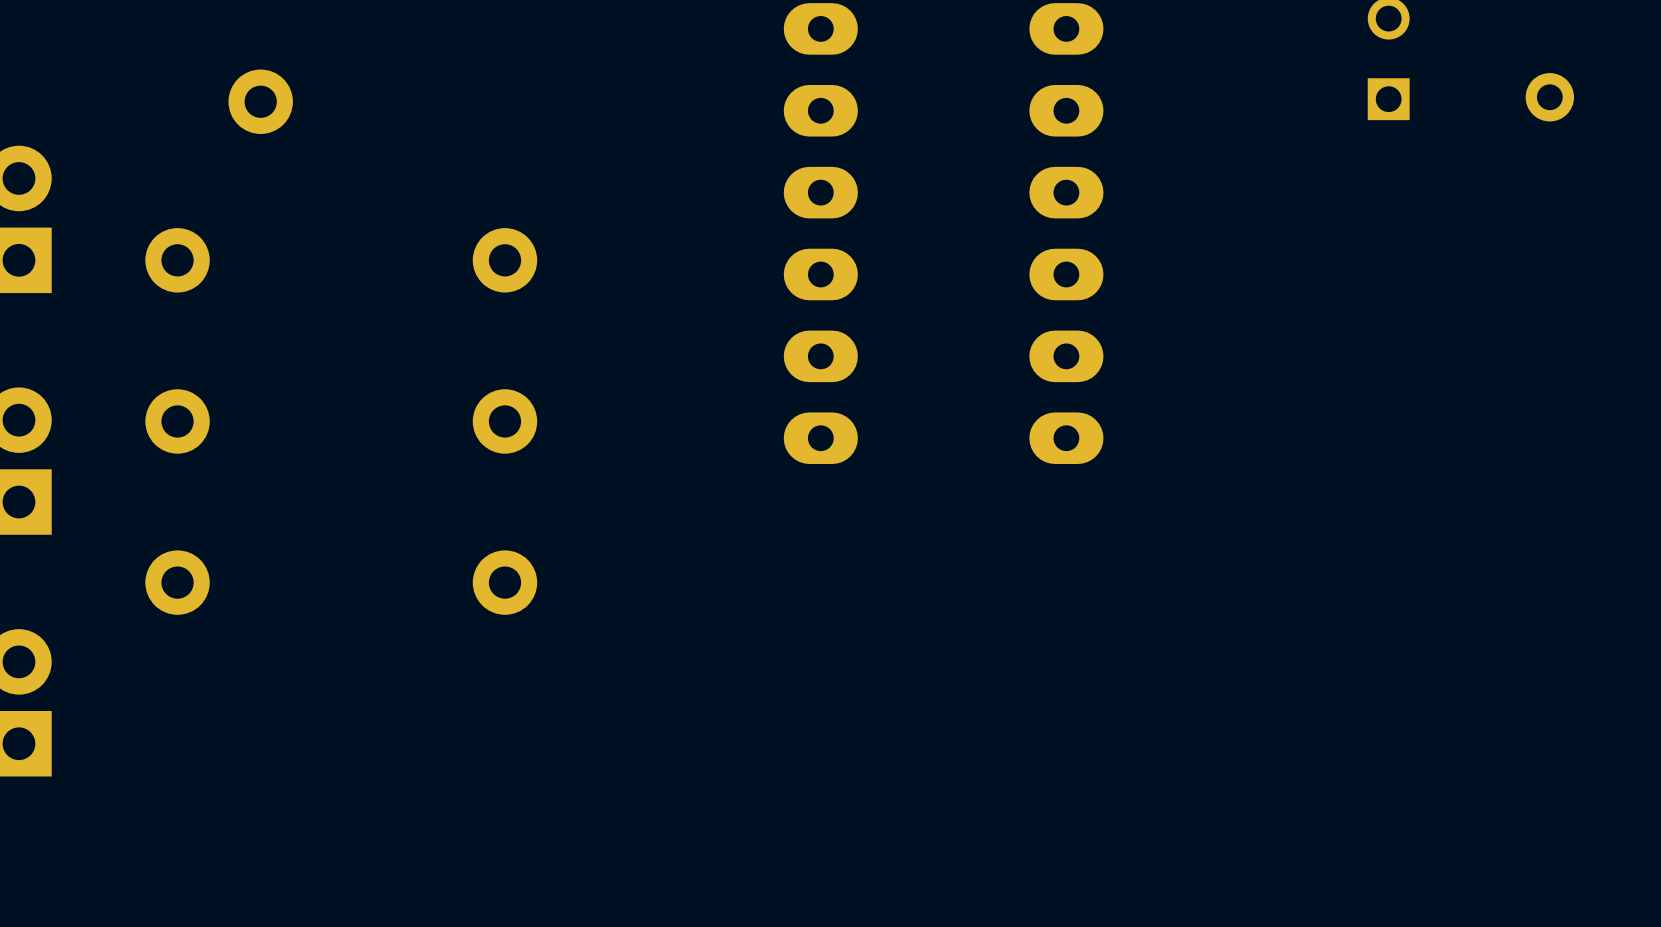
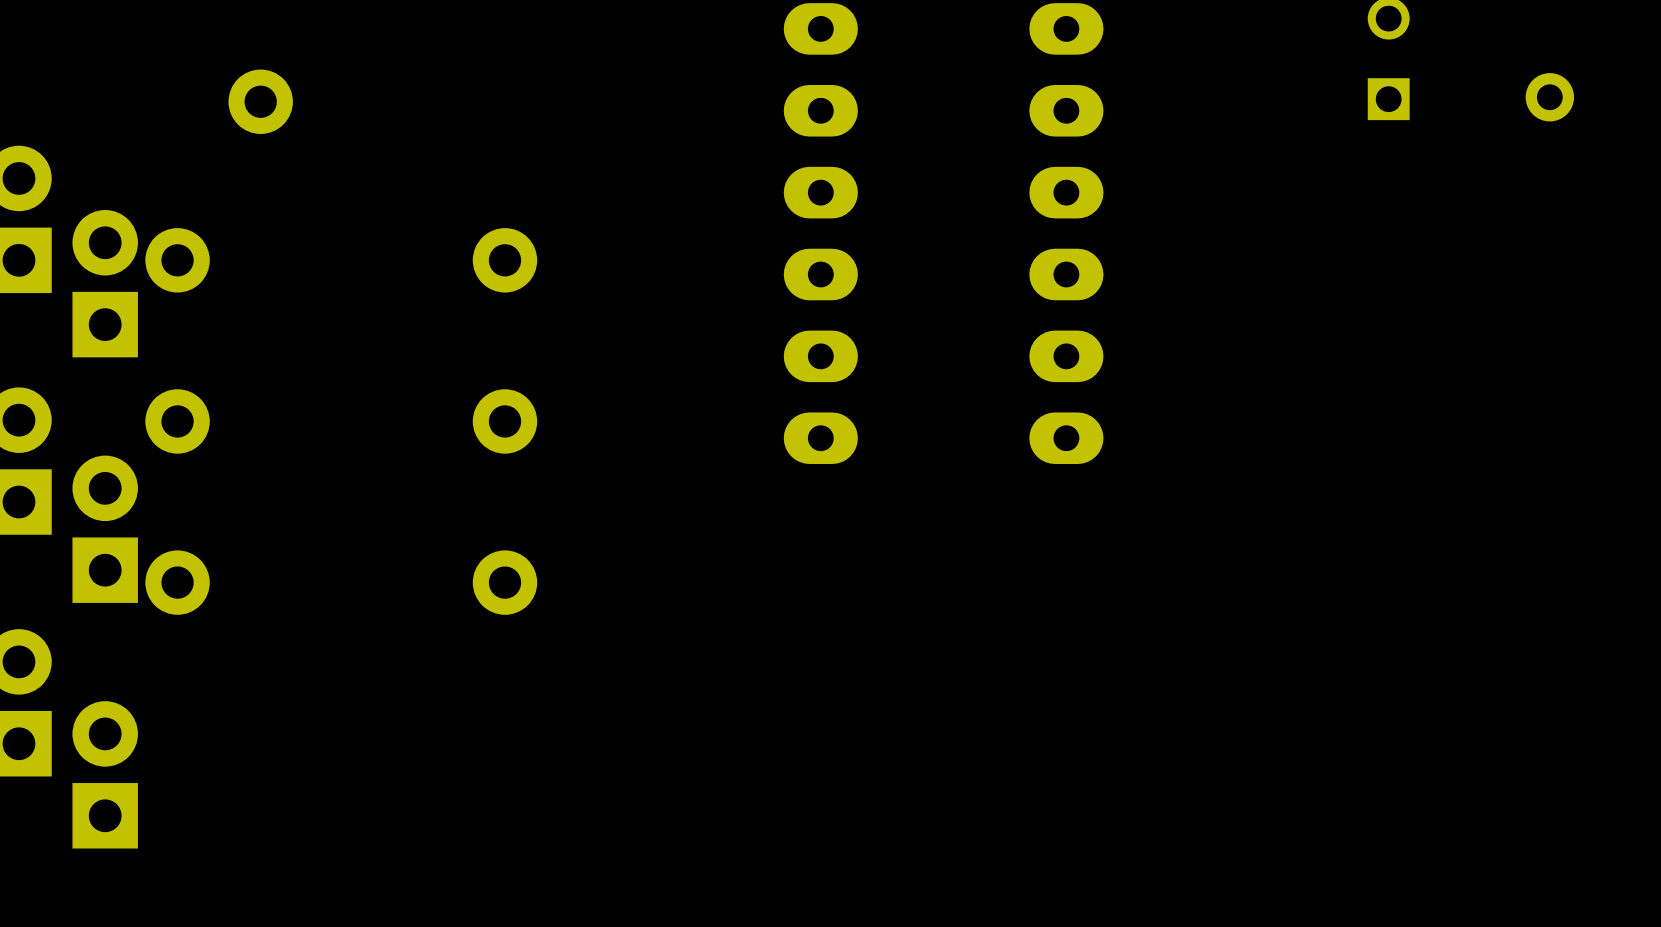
part: none -> (105, 283)
part: none -> (105, 529)
part: none -> (105, 774)

